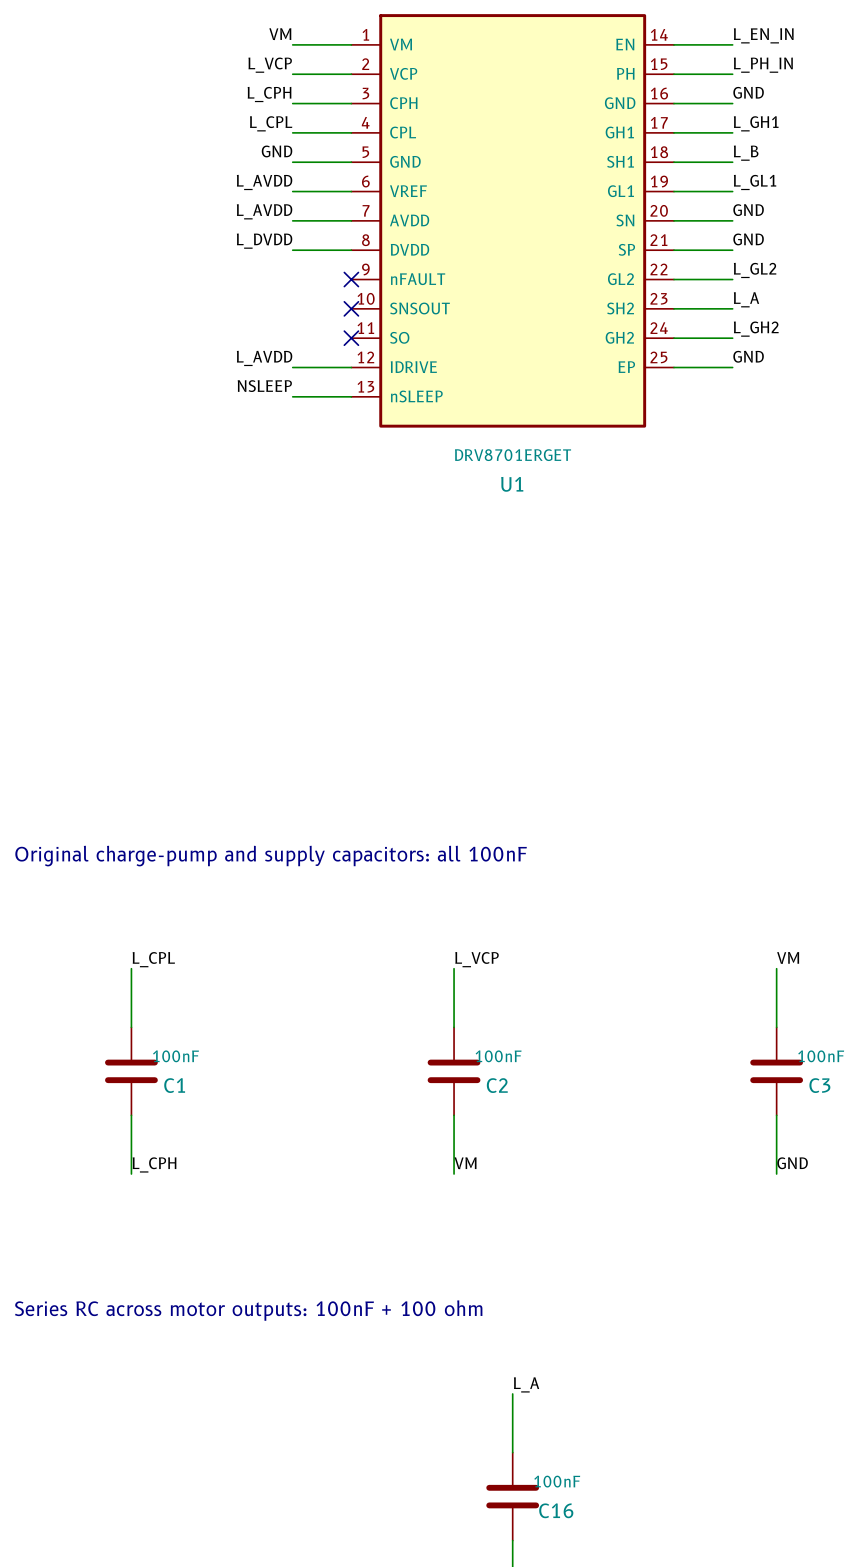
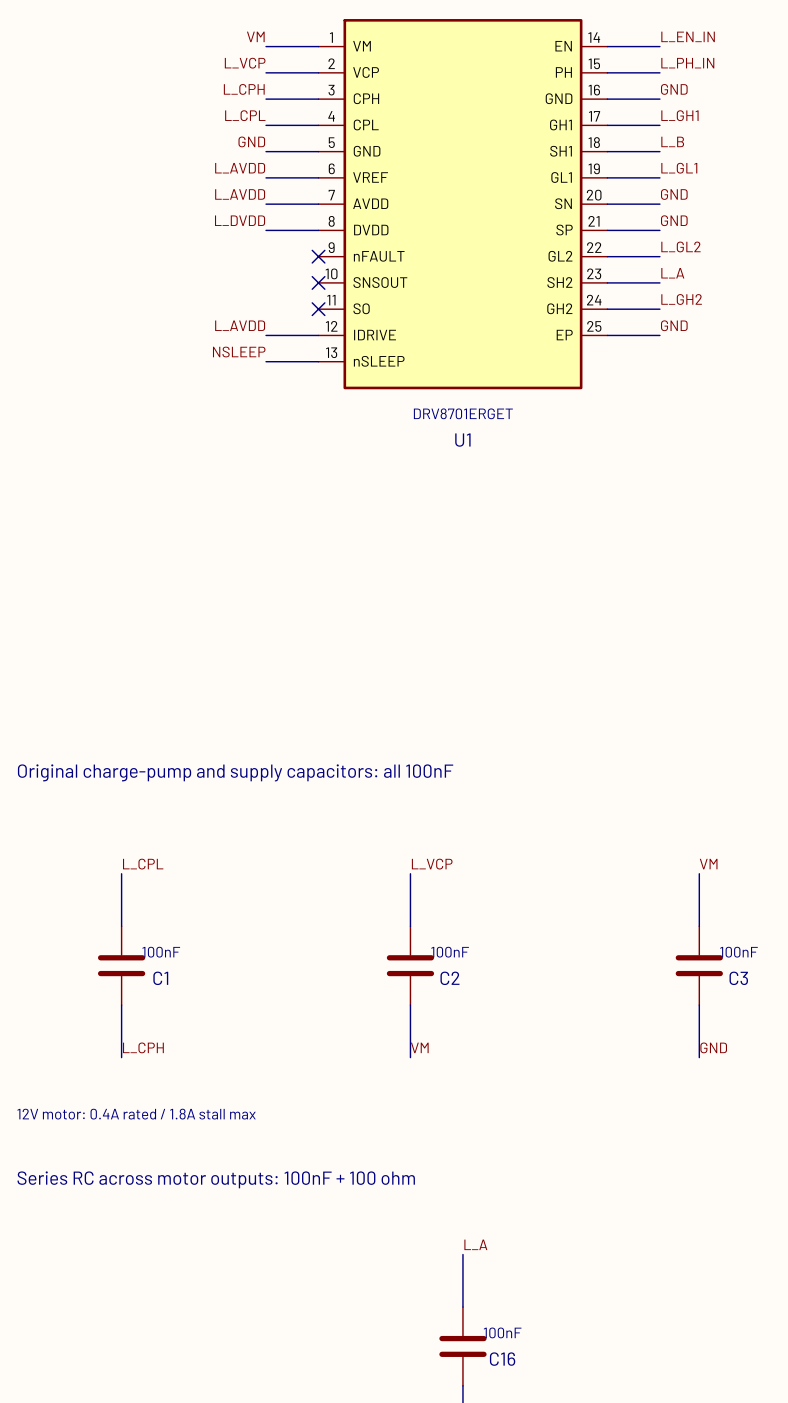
text: none -> 12V motor: 0.4A rated / 1.8A stall max (136, 1114)

